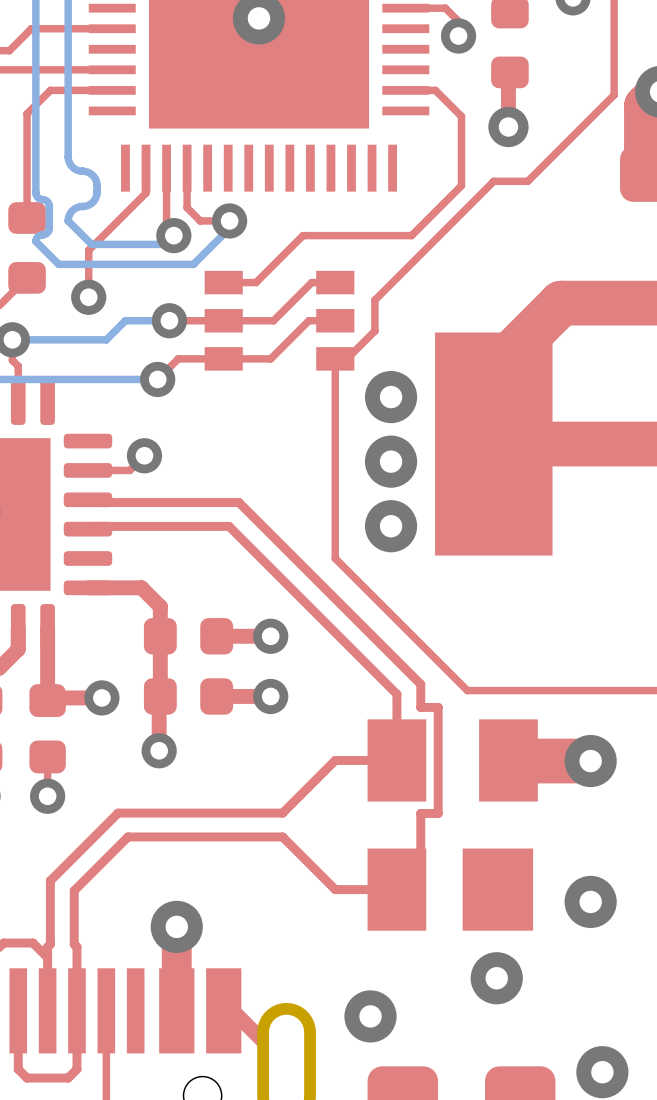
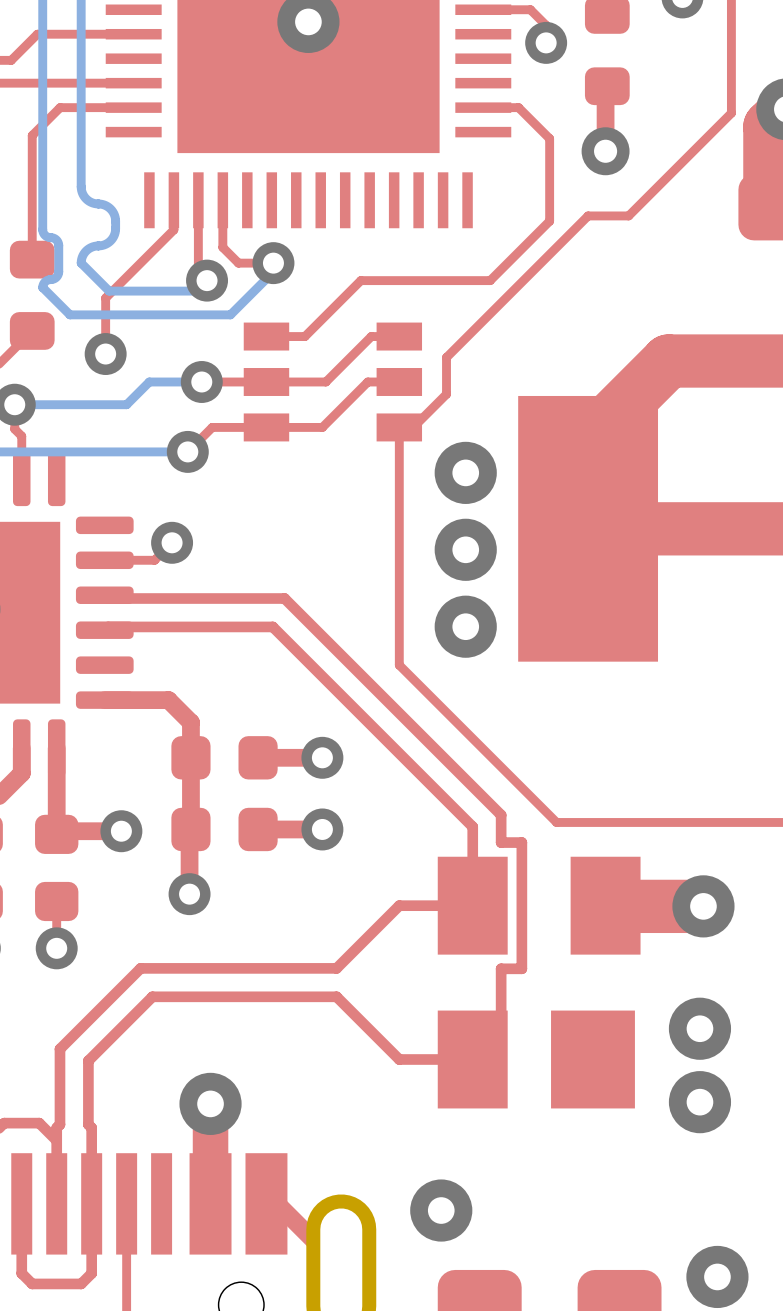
via: none -> (699, 1028)
via: (590, 901) -> none
via: none -> (699, 1102)
via: (496, 978) -> none

